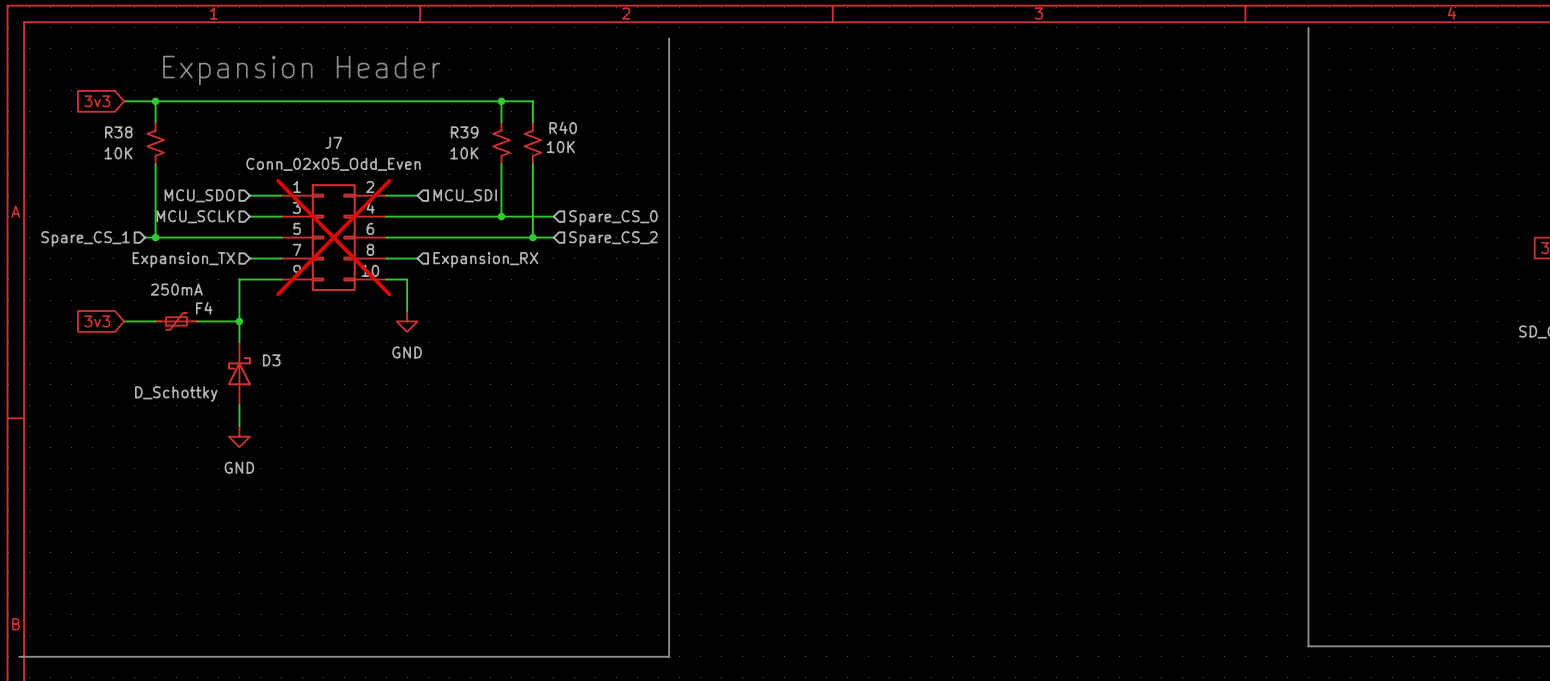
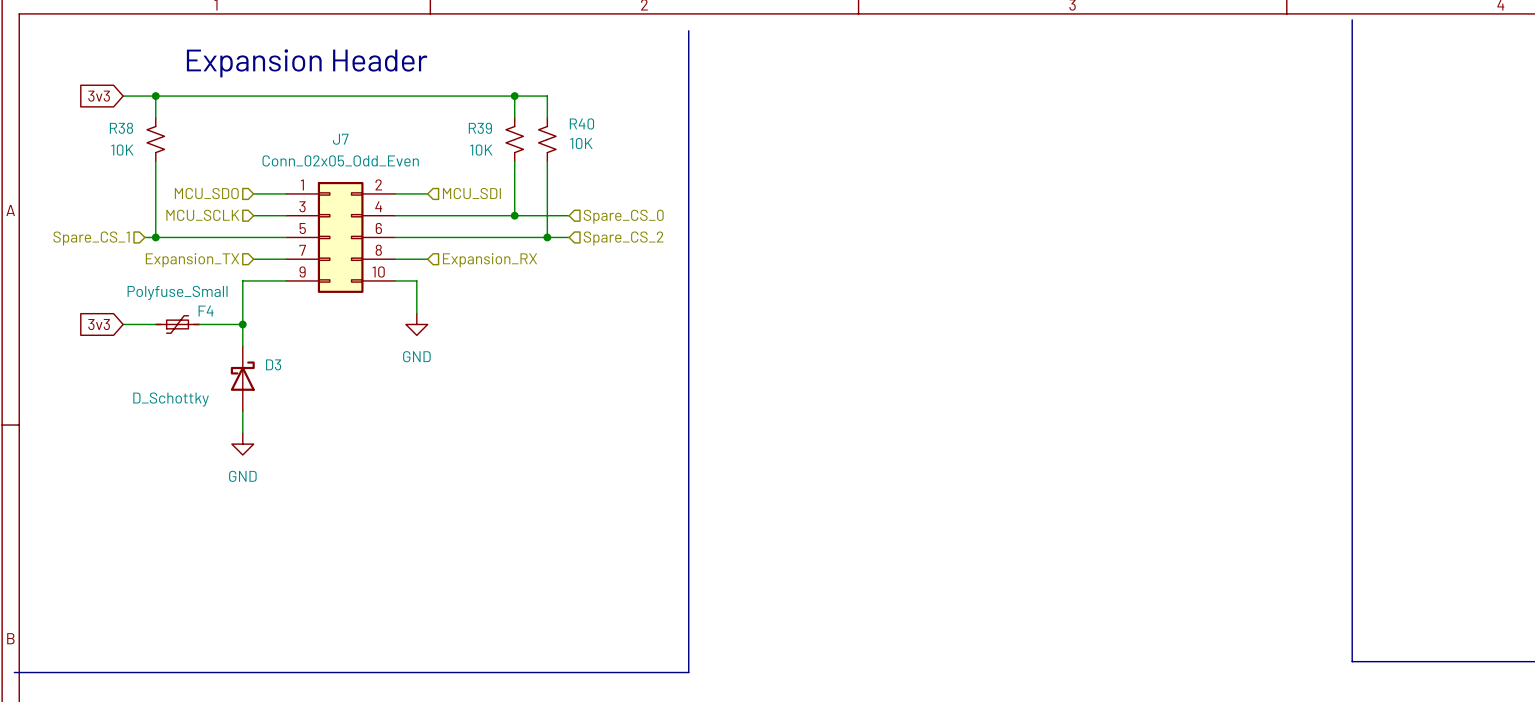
J7 do-not-place cross: (333, 237) -> none
F4 value: 250mA (176, 289) -> Polyfuse_Small (177, 292)

